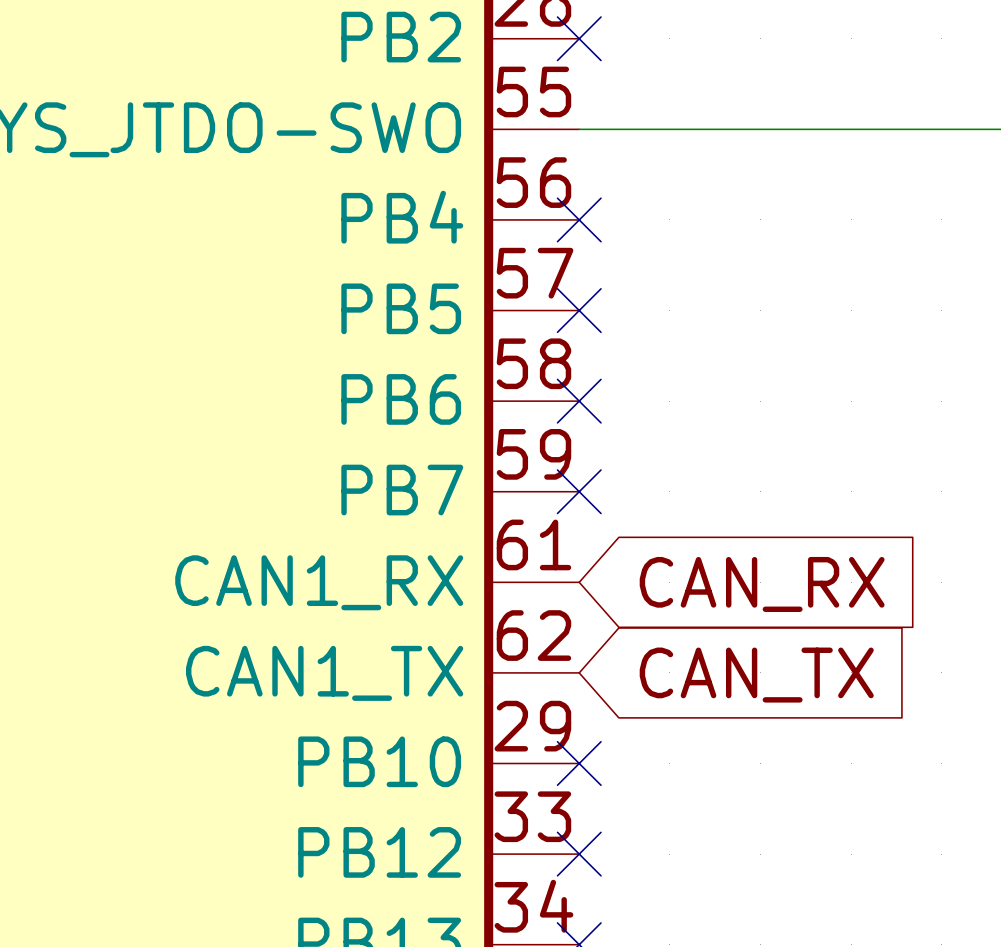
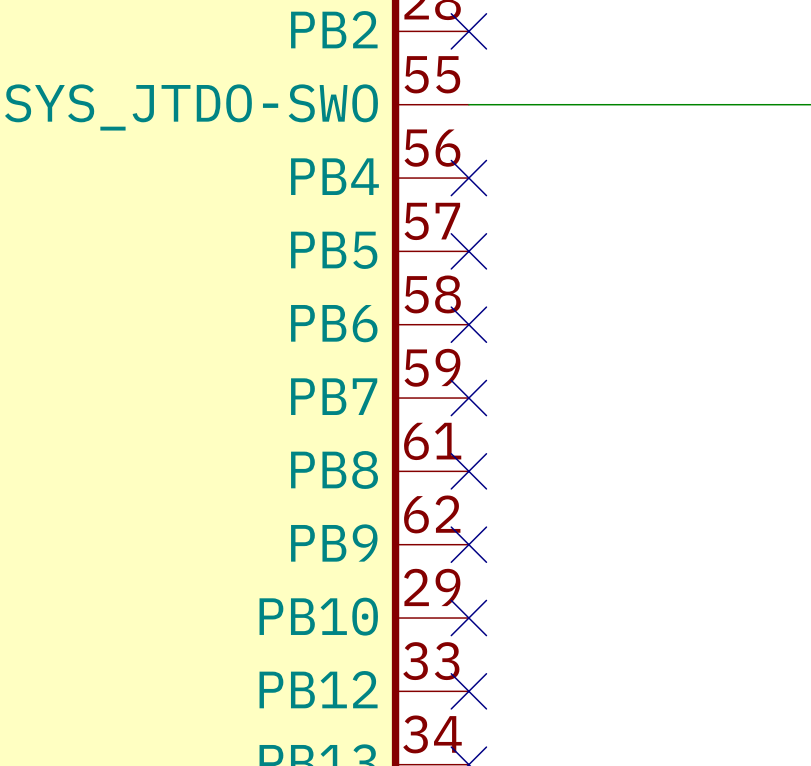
part pin name: CAN1_RX (319, 582) -> PB8 (334, 469)
no-connect mark: none -> (468, 471)
global label: CAN_RX (762, 584) -> none
no-connect mark: none -> (468, 544)
part pin name: CAN1_TX (324, 673) -> PB9 (334, 543)
global label: CAN_TX (756, 675) -> none

